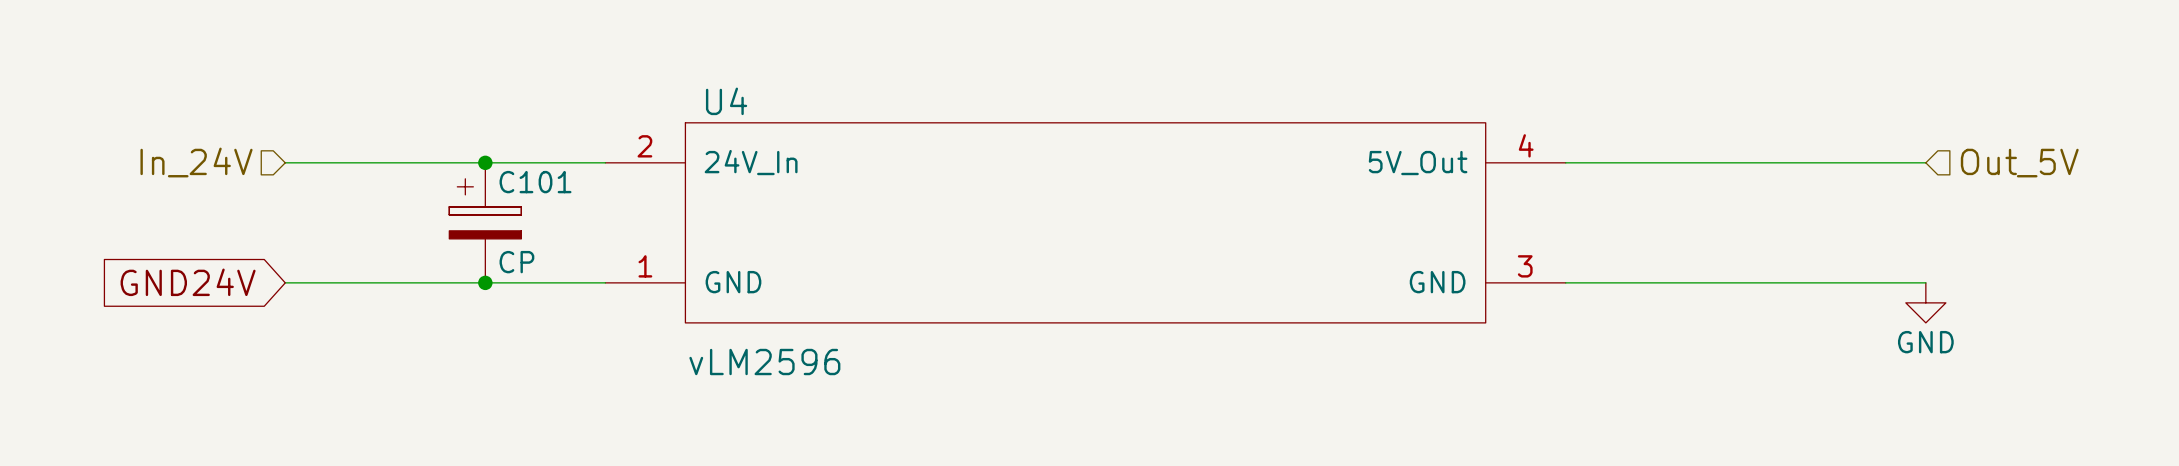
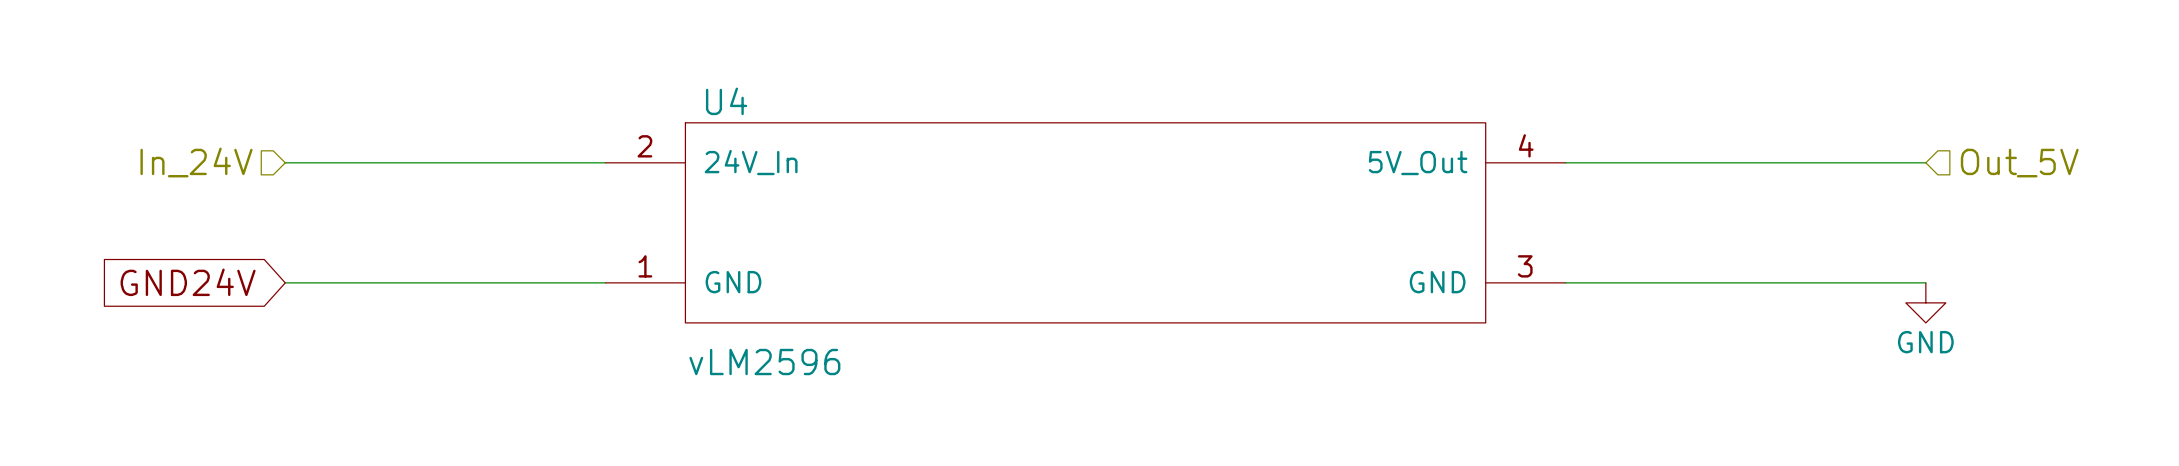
junction: (485, 162) -> none
C101: CP (485, 222) -> none
junction: (485, 282) -> none

